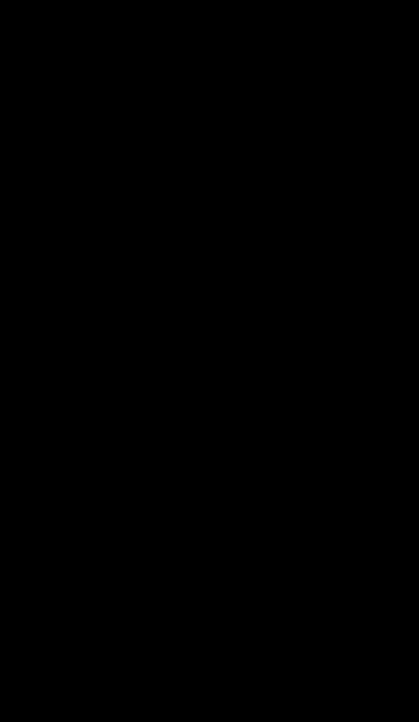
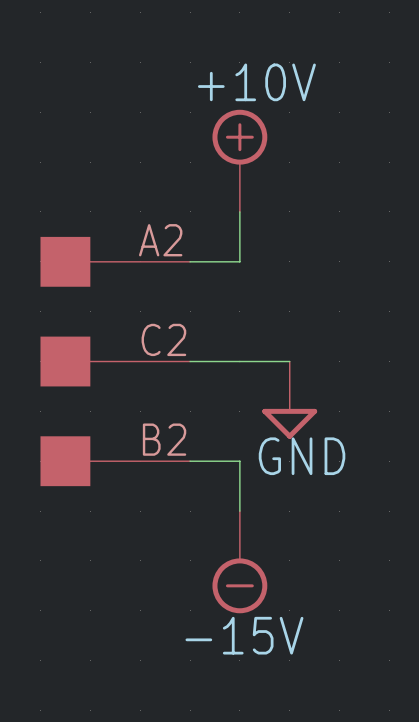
power symbol: none -> +10V (239, 160)
wire: none -> (239, 211) (239, 261) (190, 261)
part: none -> (115, 261)
part: none -> (115, 361)
wire: none -> (190, 361) (289, 361)
power symbol: none -> GND (289, 400)
part: none -> (115, 461)
wire: none -> (190, 461) (239, 461) (239, 511)
power symbol: none -> -15V (239, 562)

